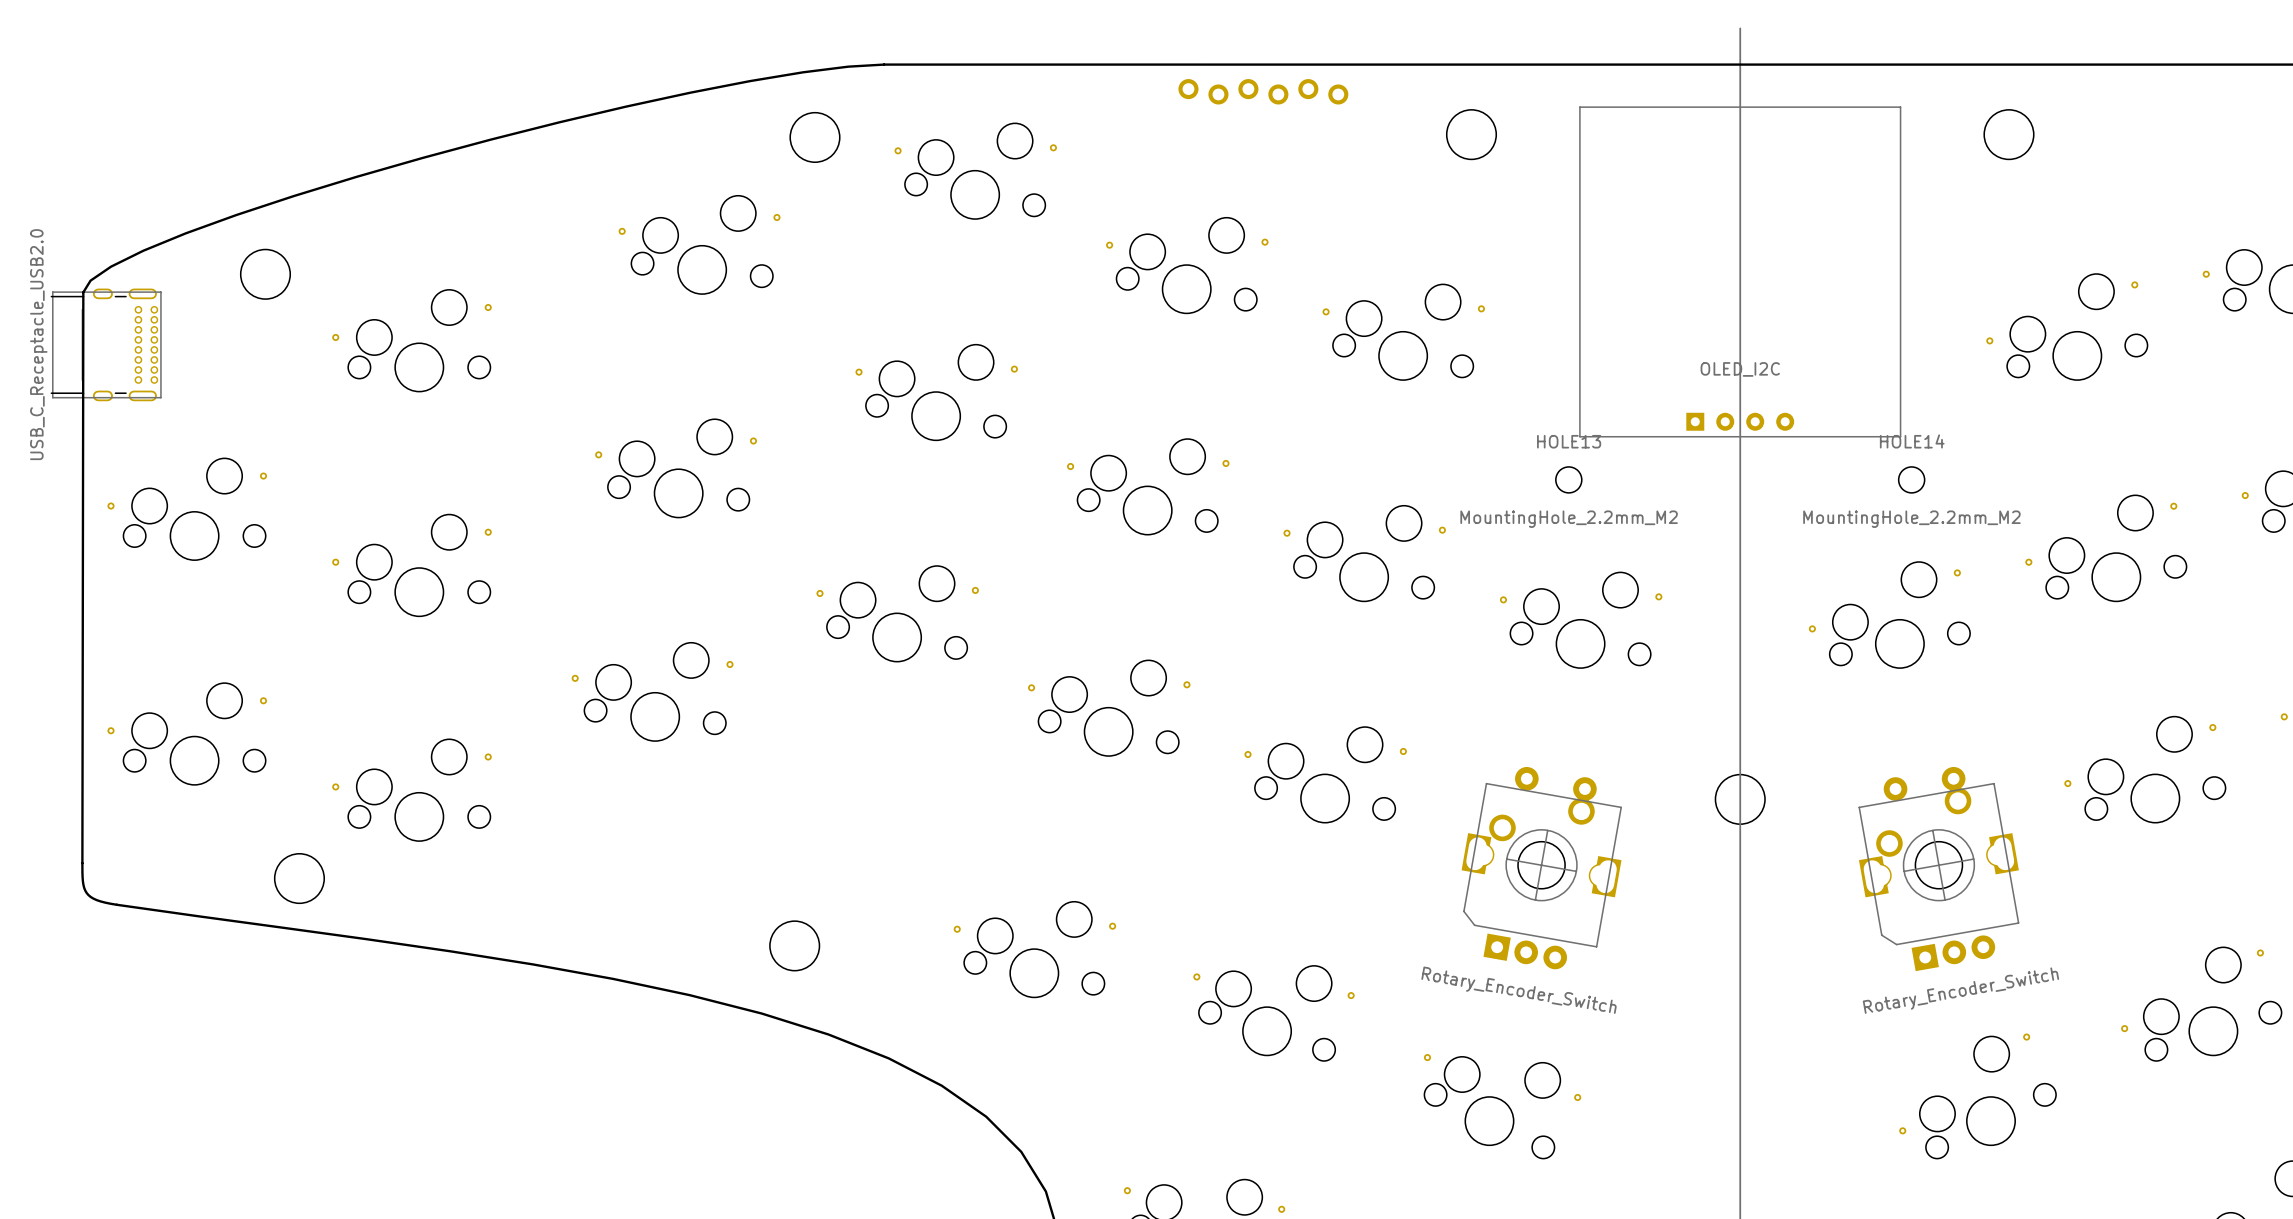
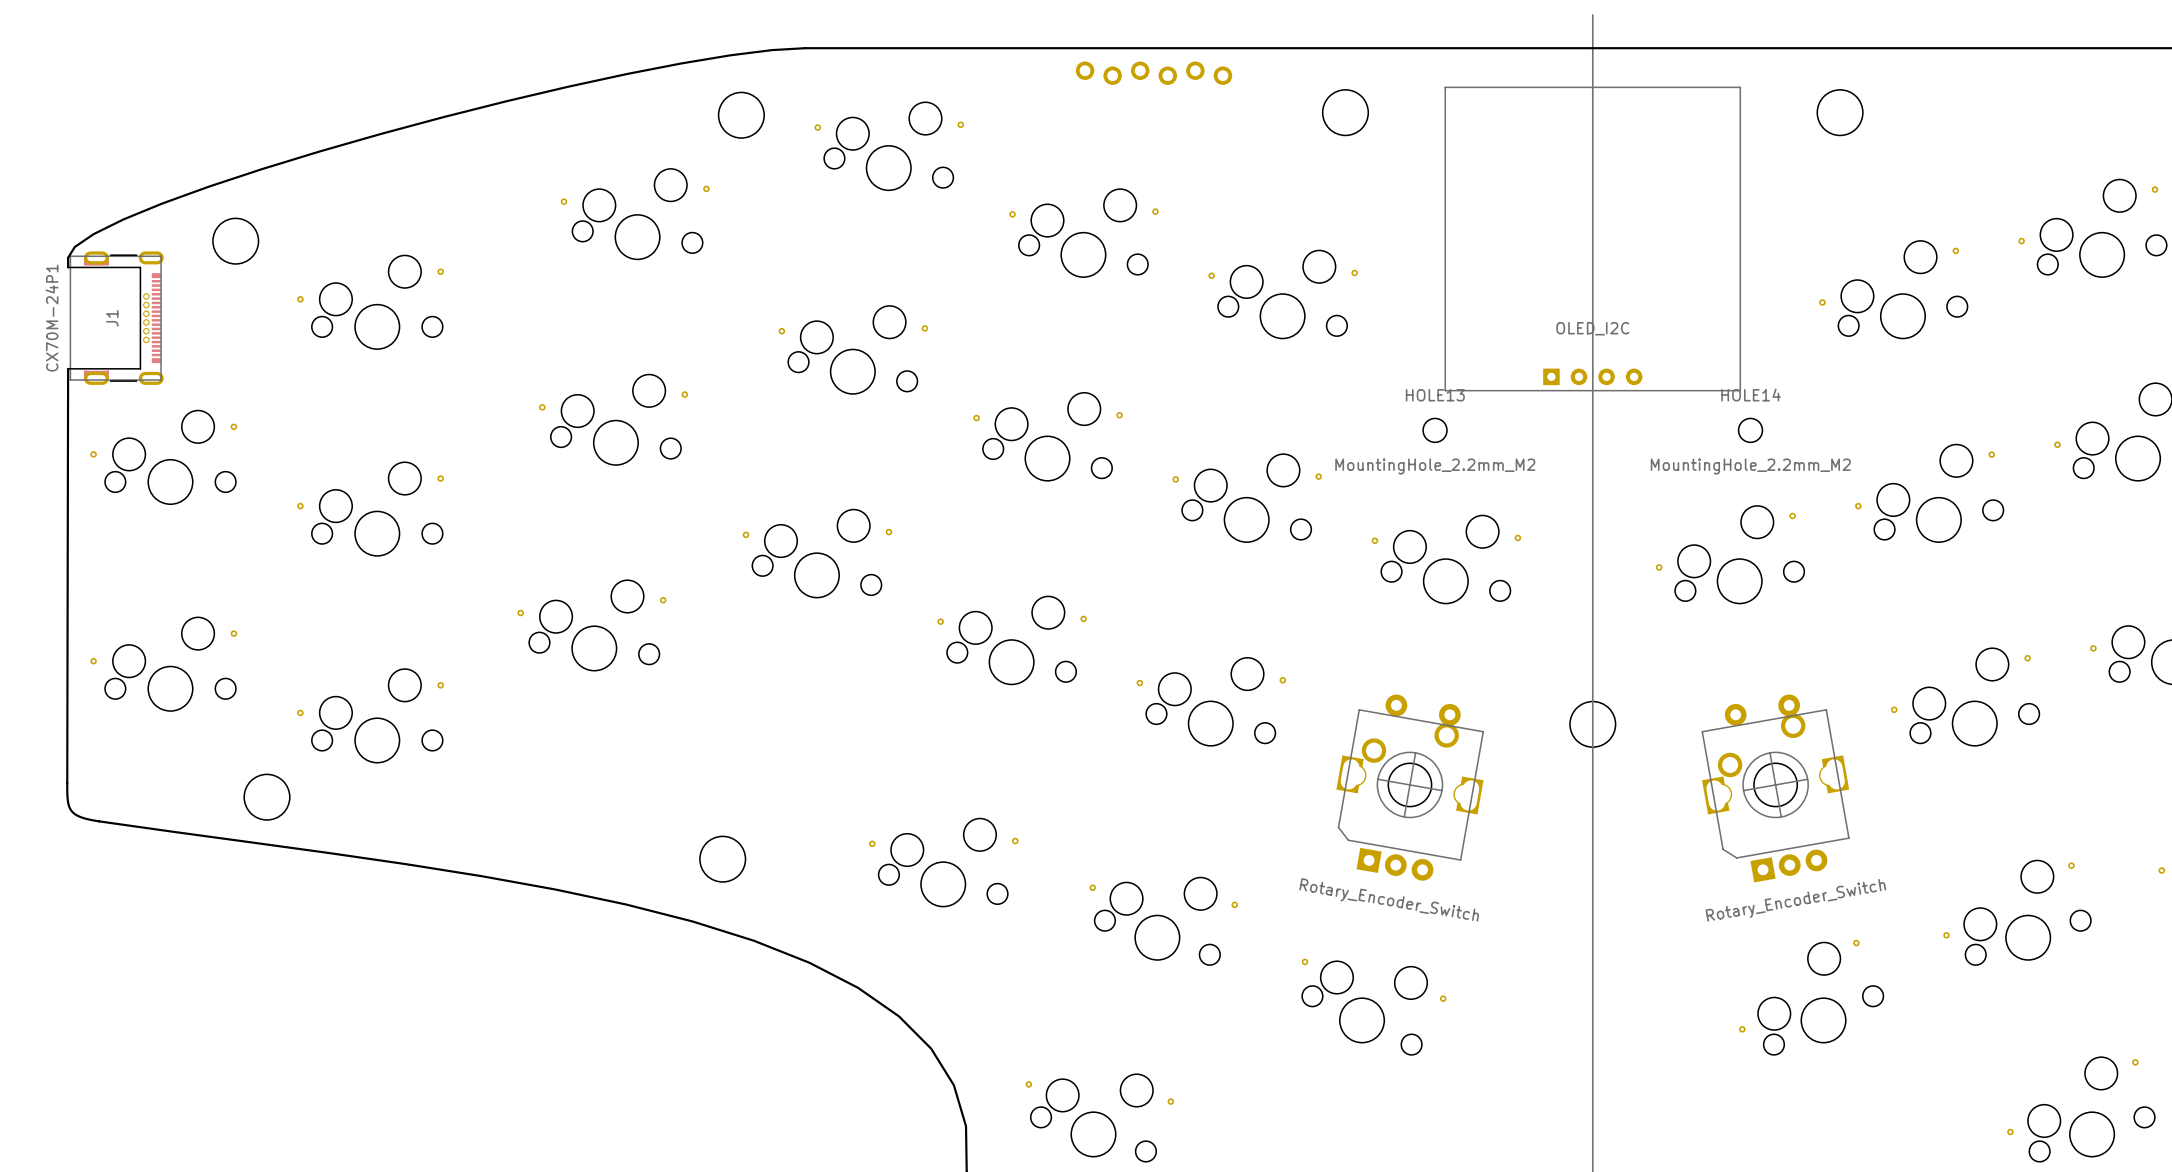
board edge: (83, 292) (82, 863) -> (68, 257) (68, 267) (140, 267) (140, 368) (68, 368) (67, 783)
part: USB_C_Receptacle_USB2.0 (106, 344) -> none
J1: none -> CX70M-24P1 (116, 318)

